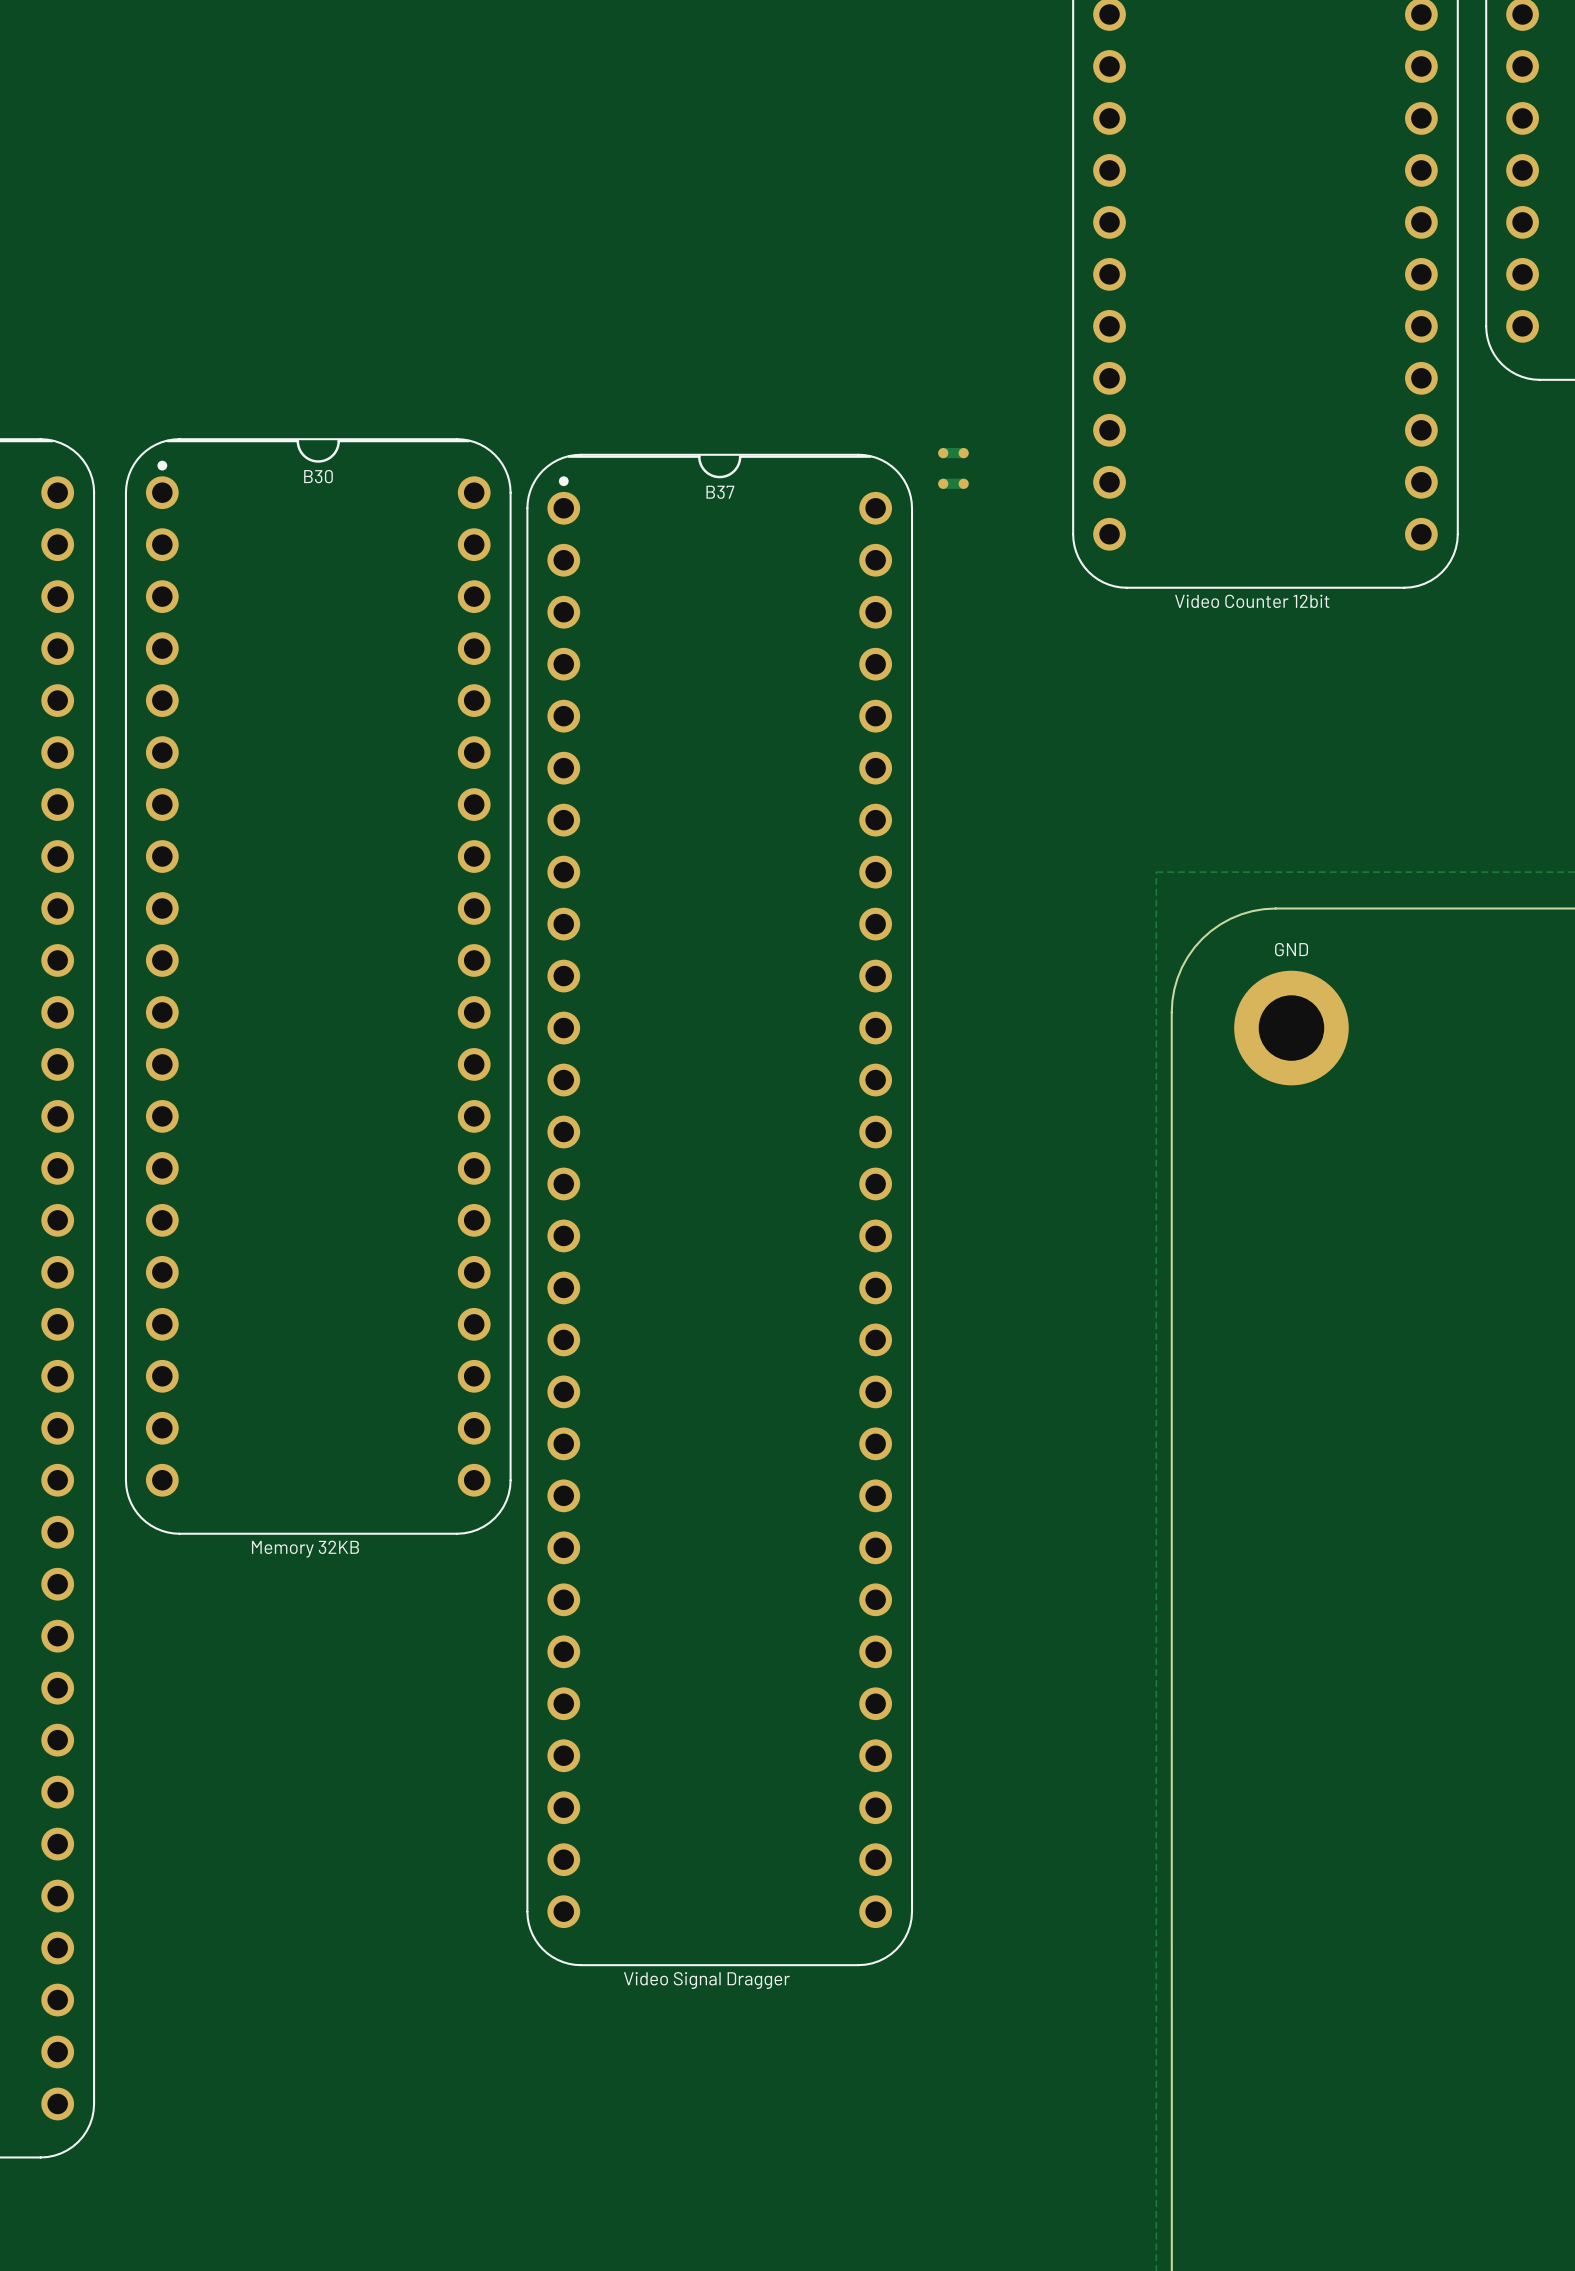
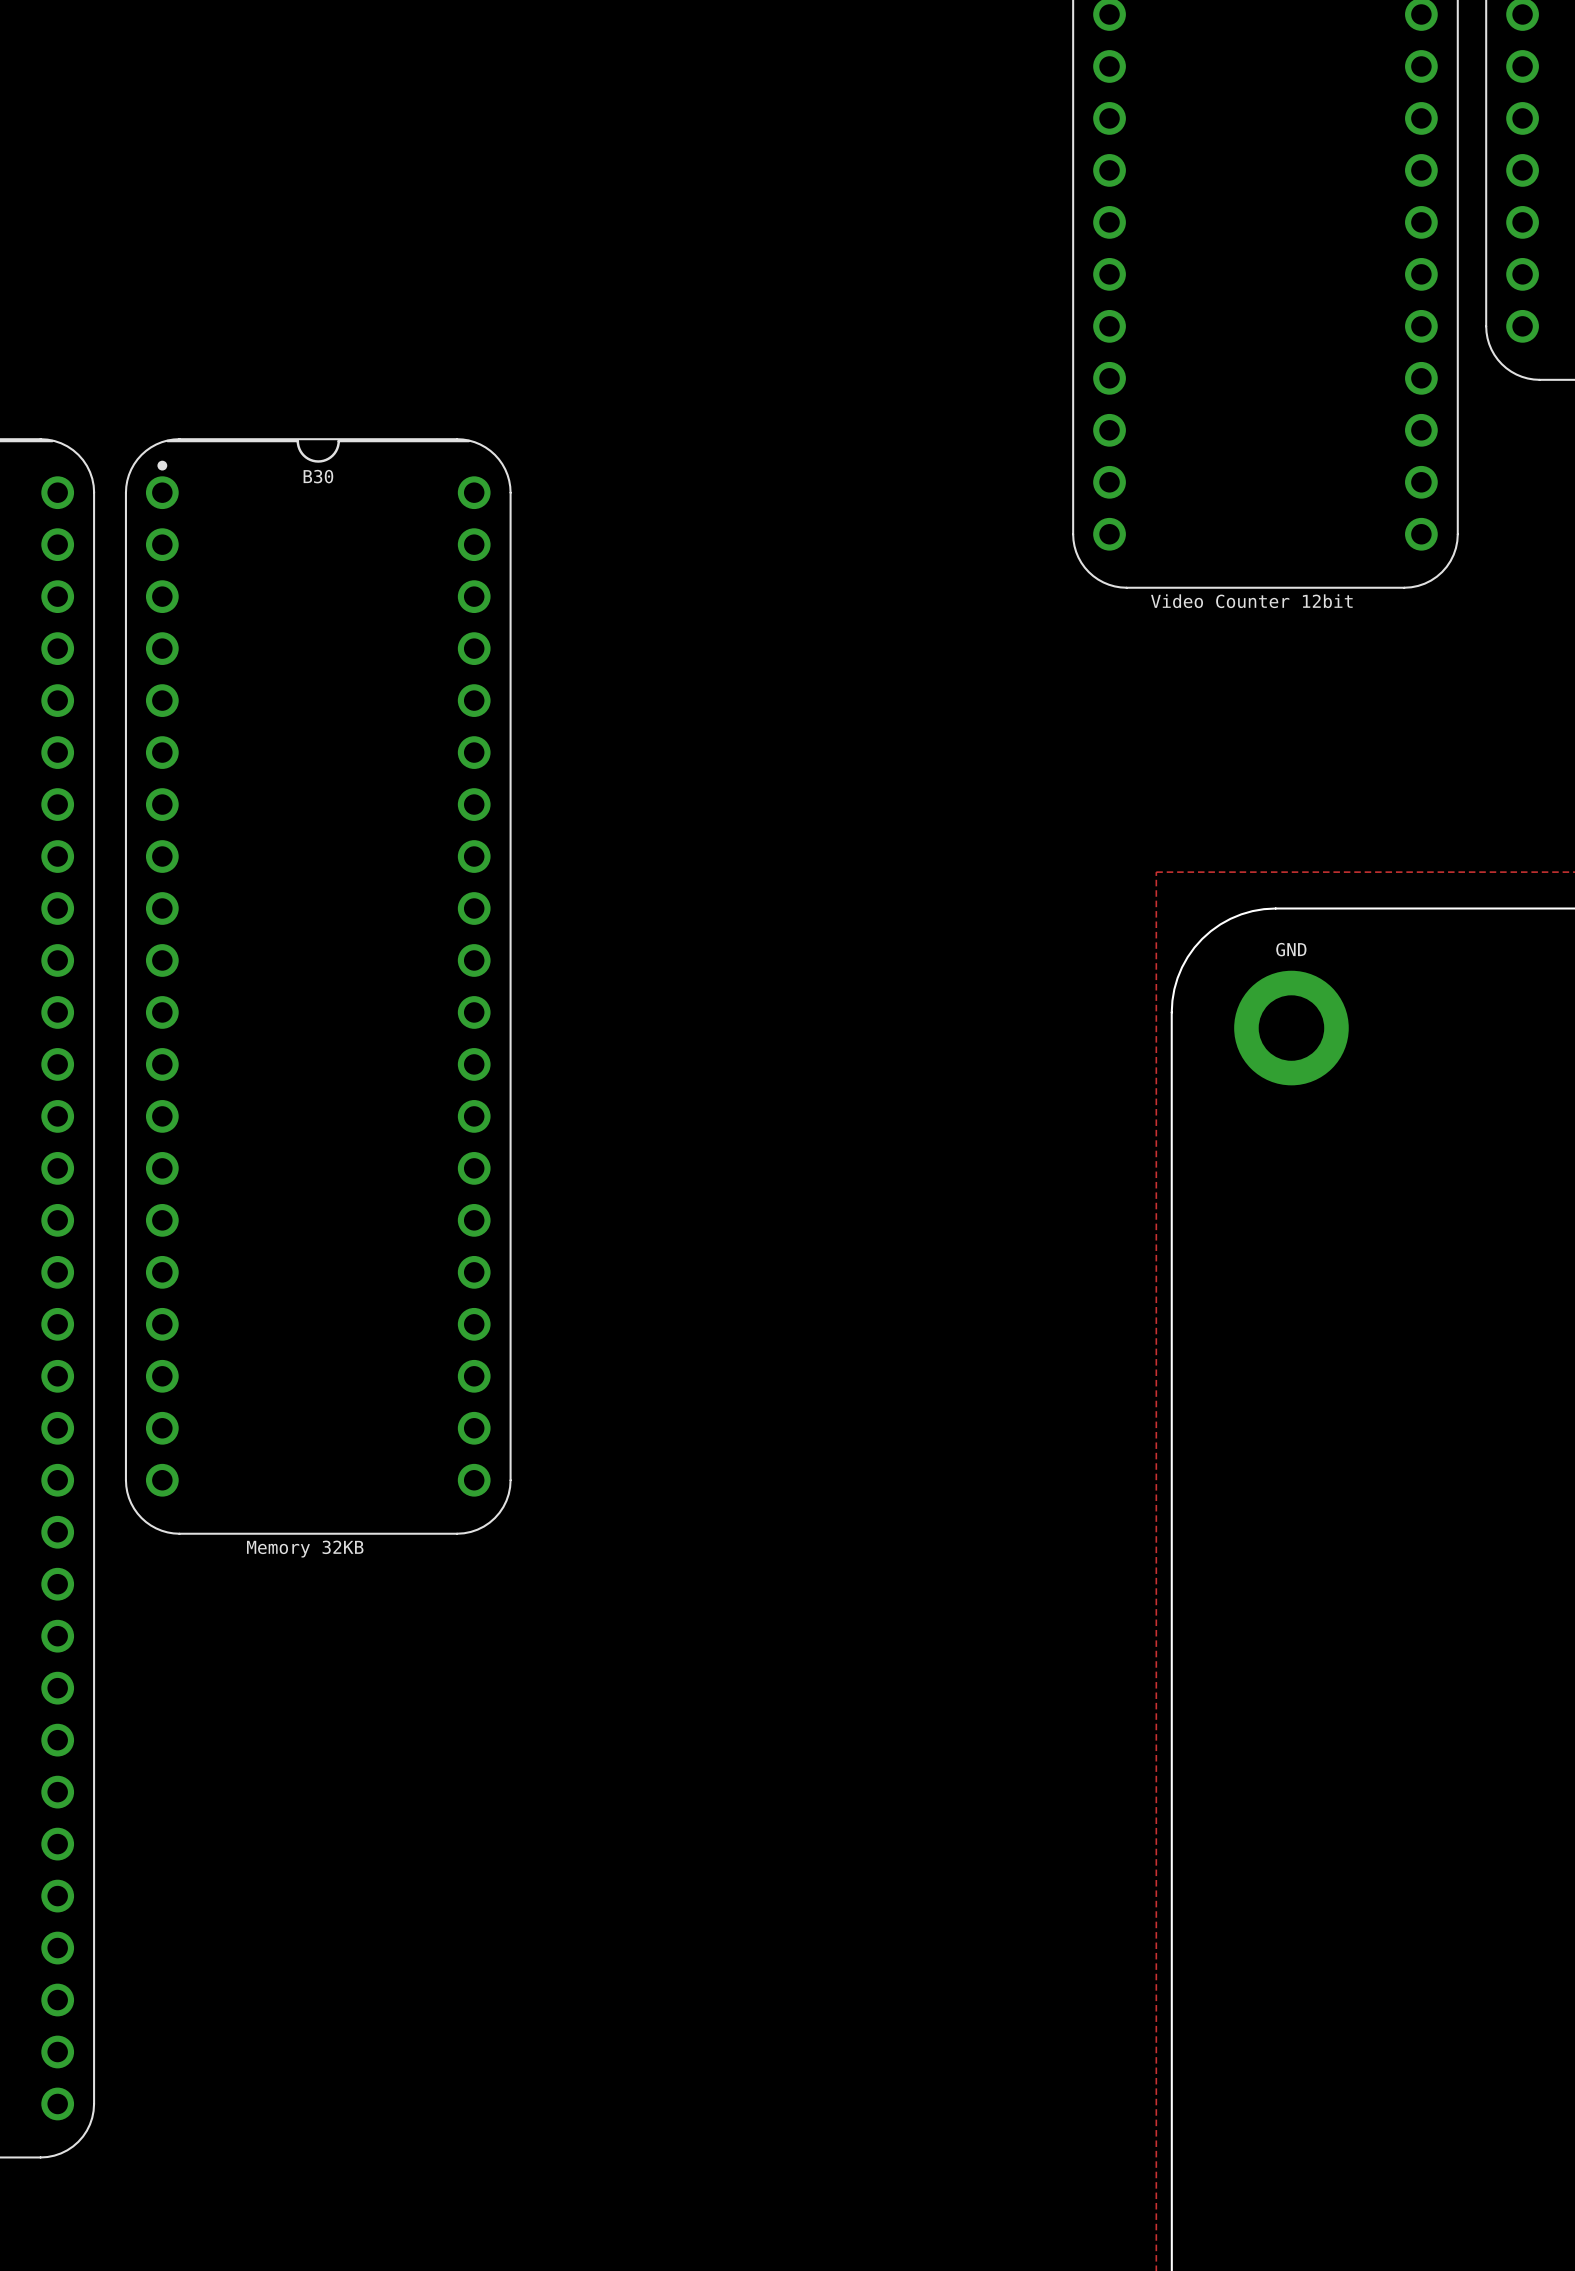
part: (953, 453) -> none
part: (953, 483) -> none
B37: (719, 1209) -> none

